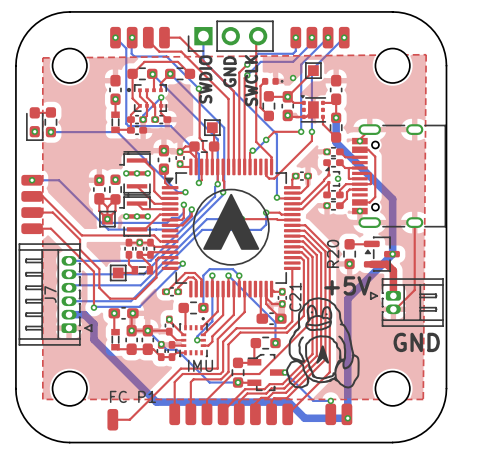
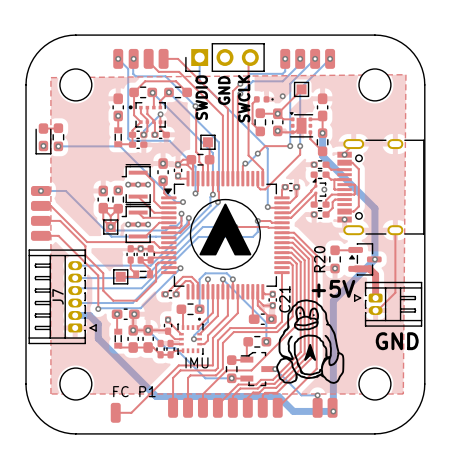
via: (161, 344) -> none

